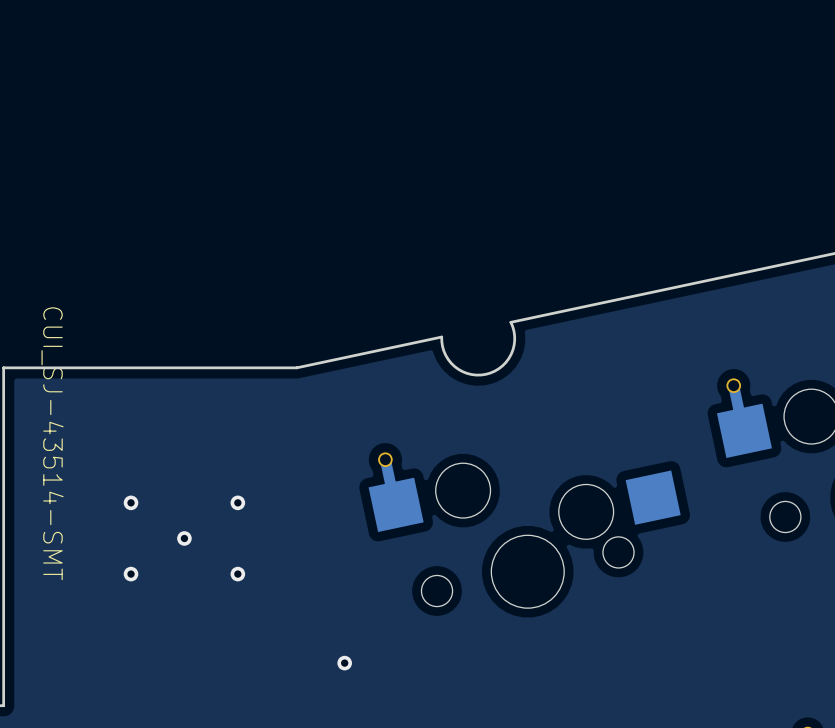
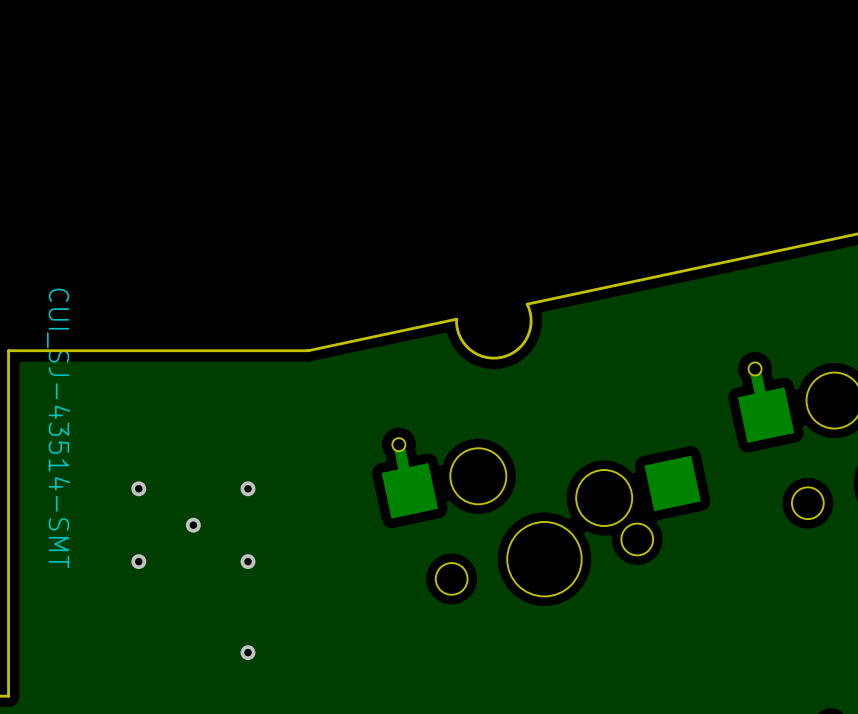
via position: (344, 663) -> (248, 652)

